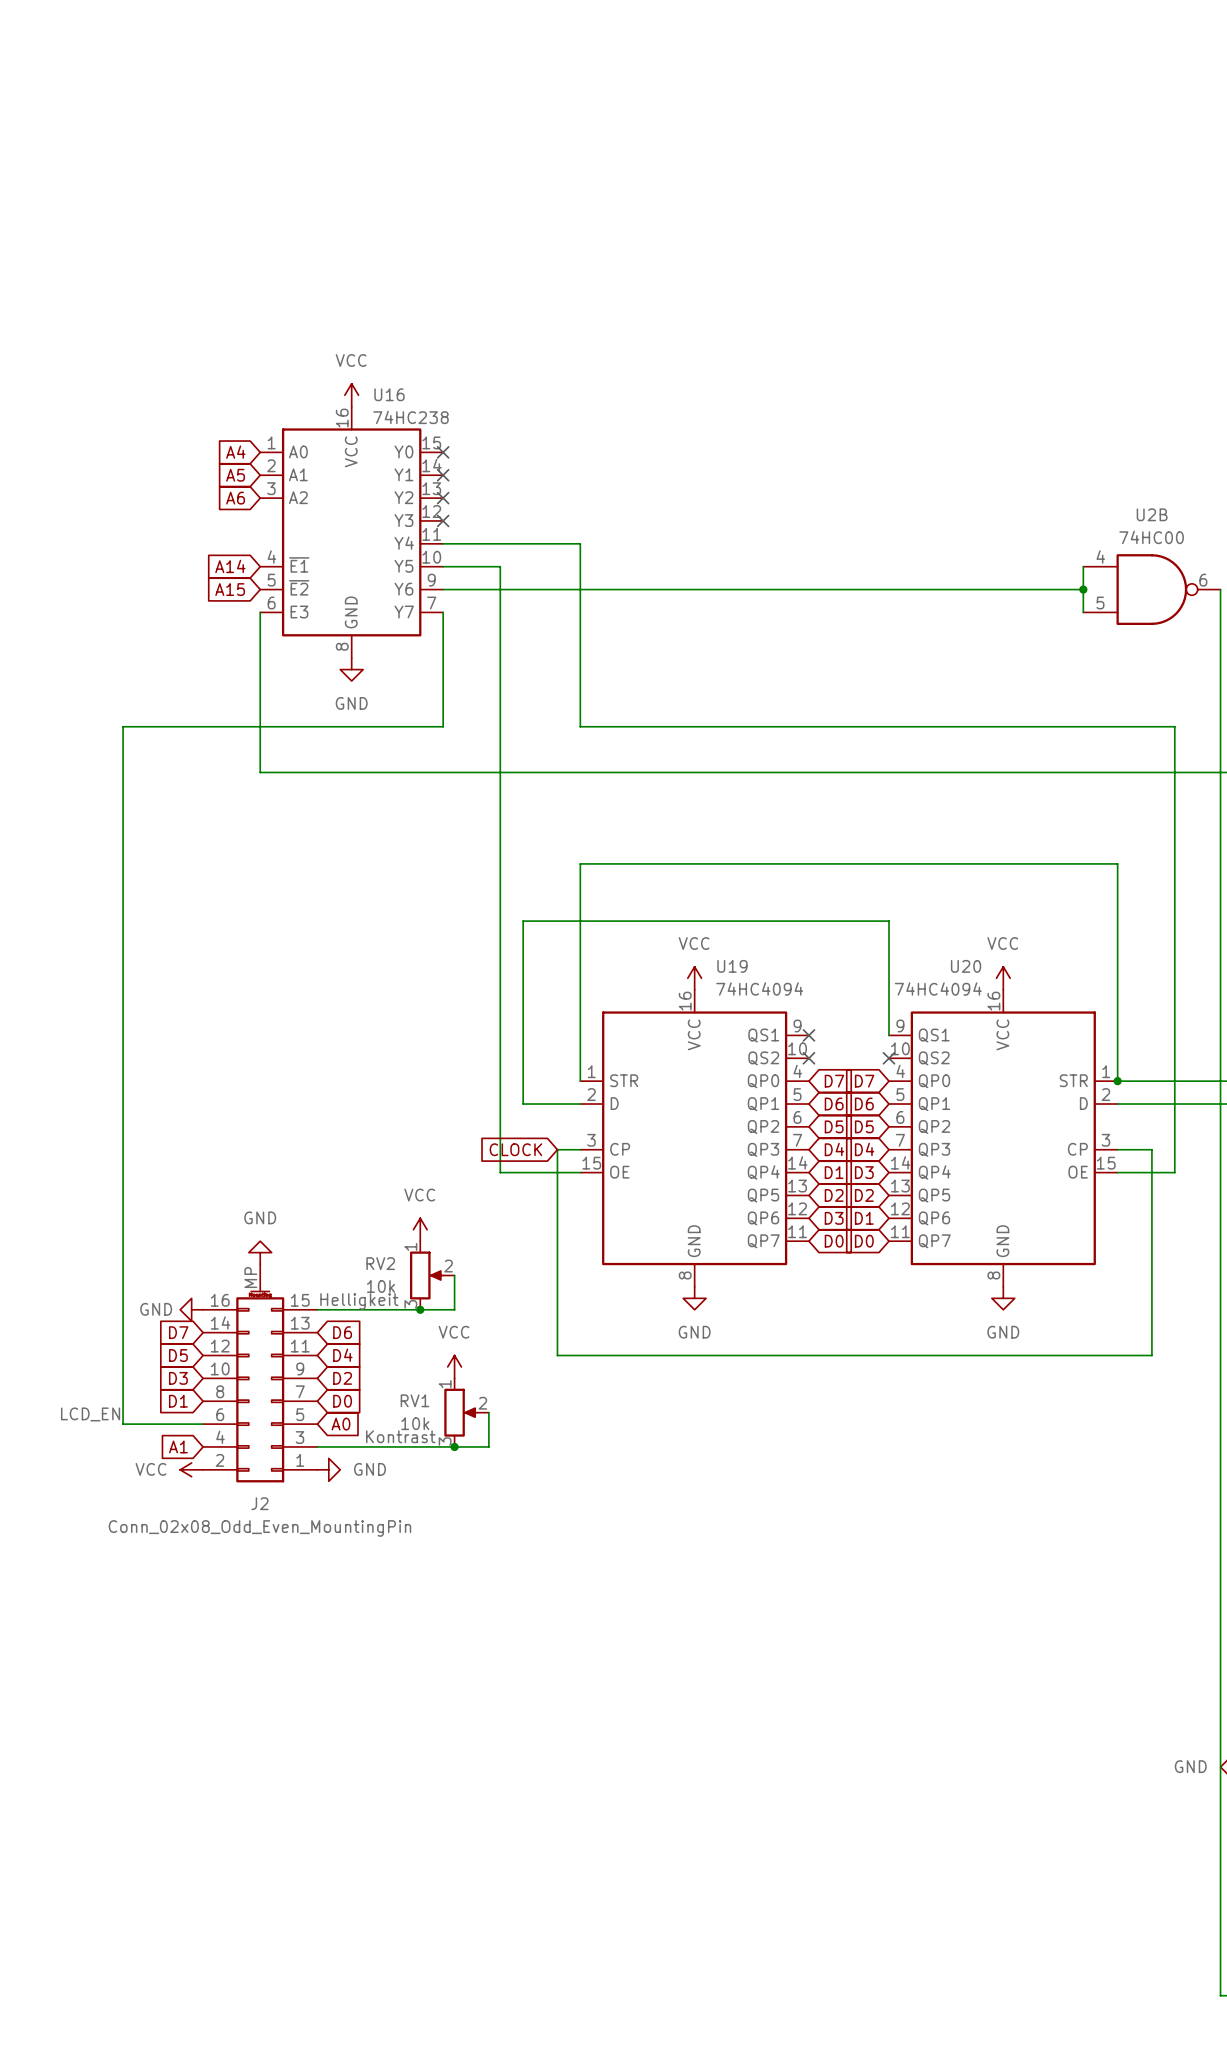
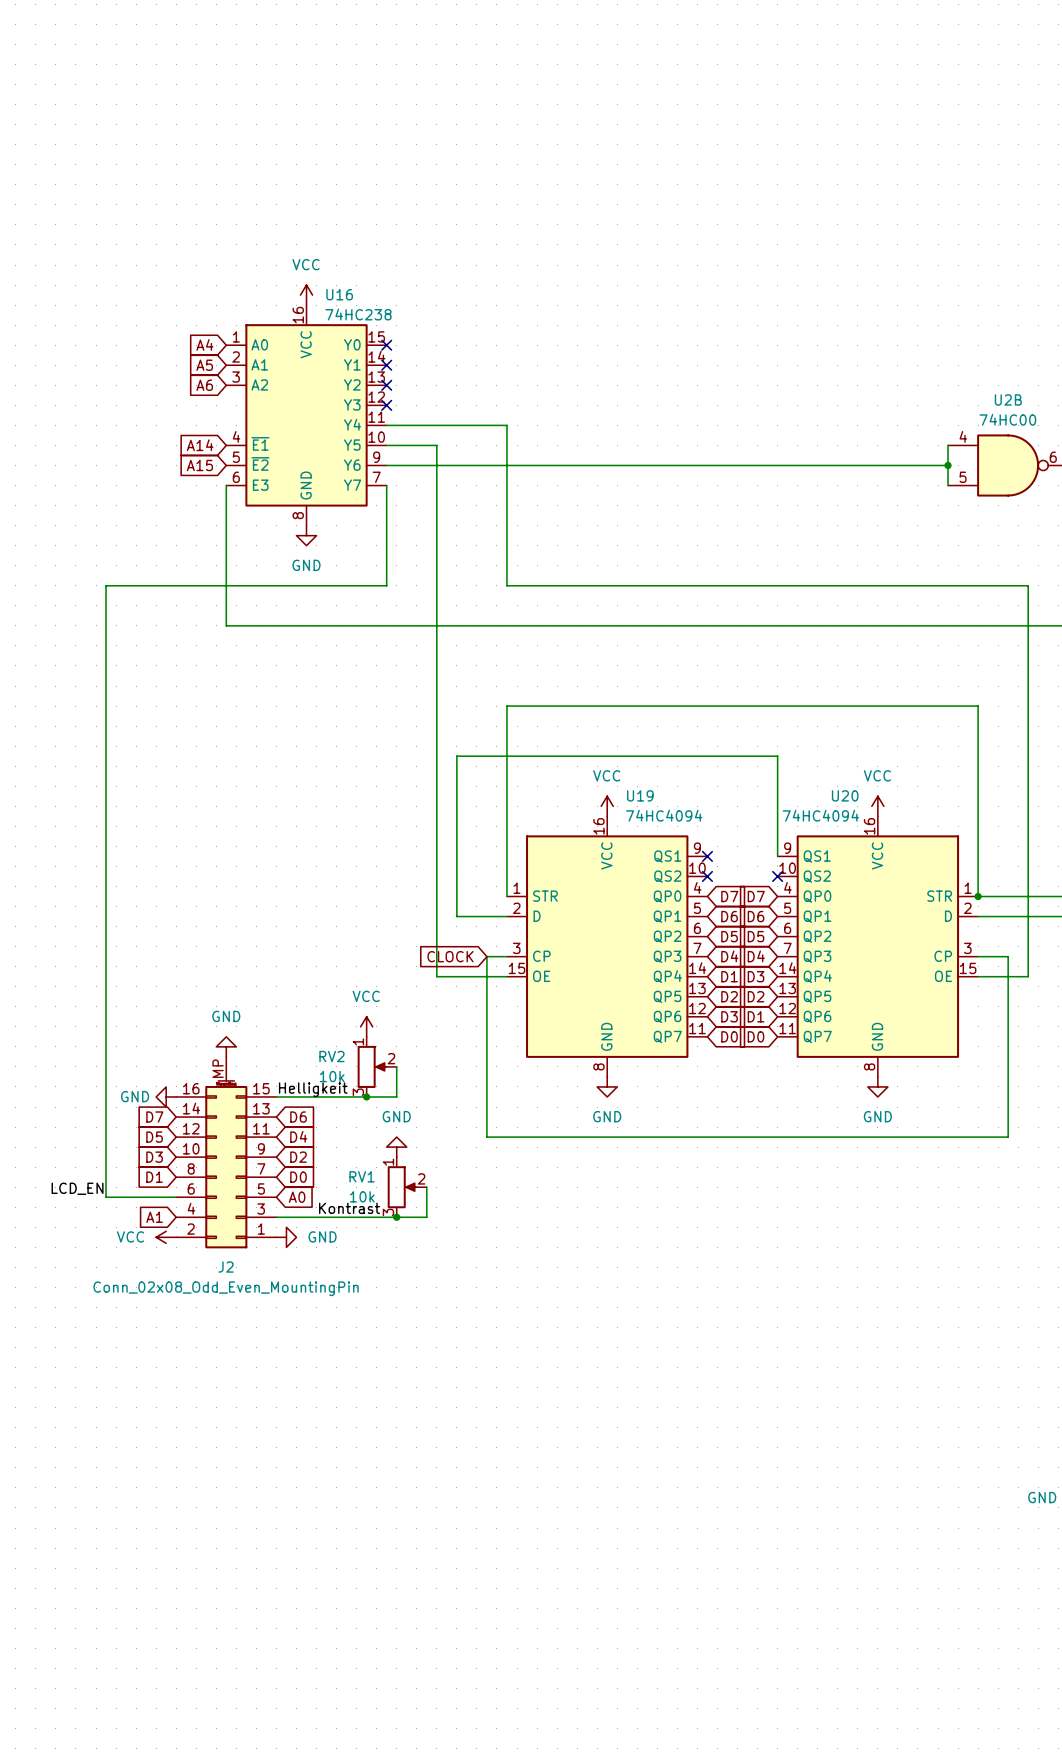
power symbol: VCC (454, 1366) -> GND (396, 1147)

